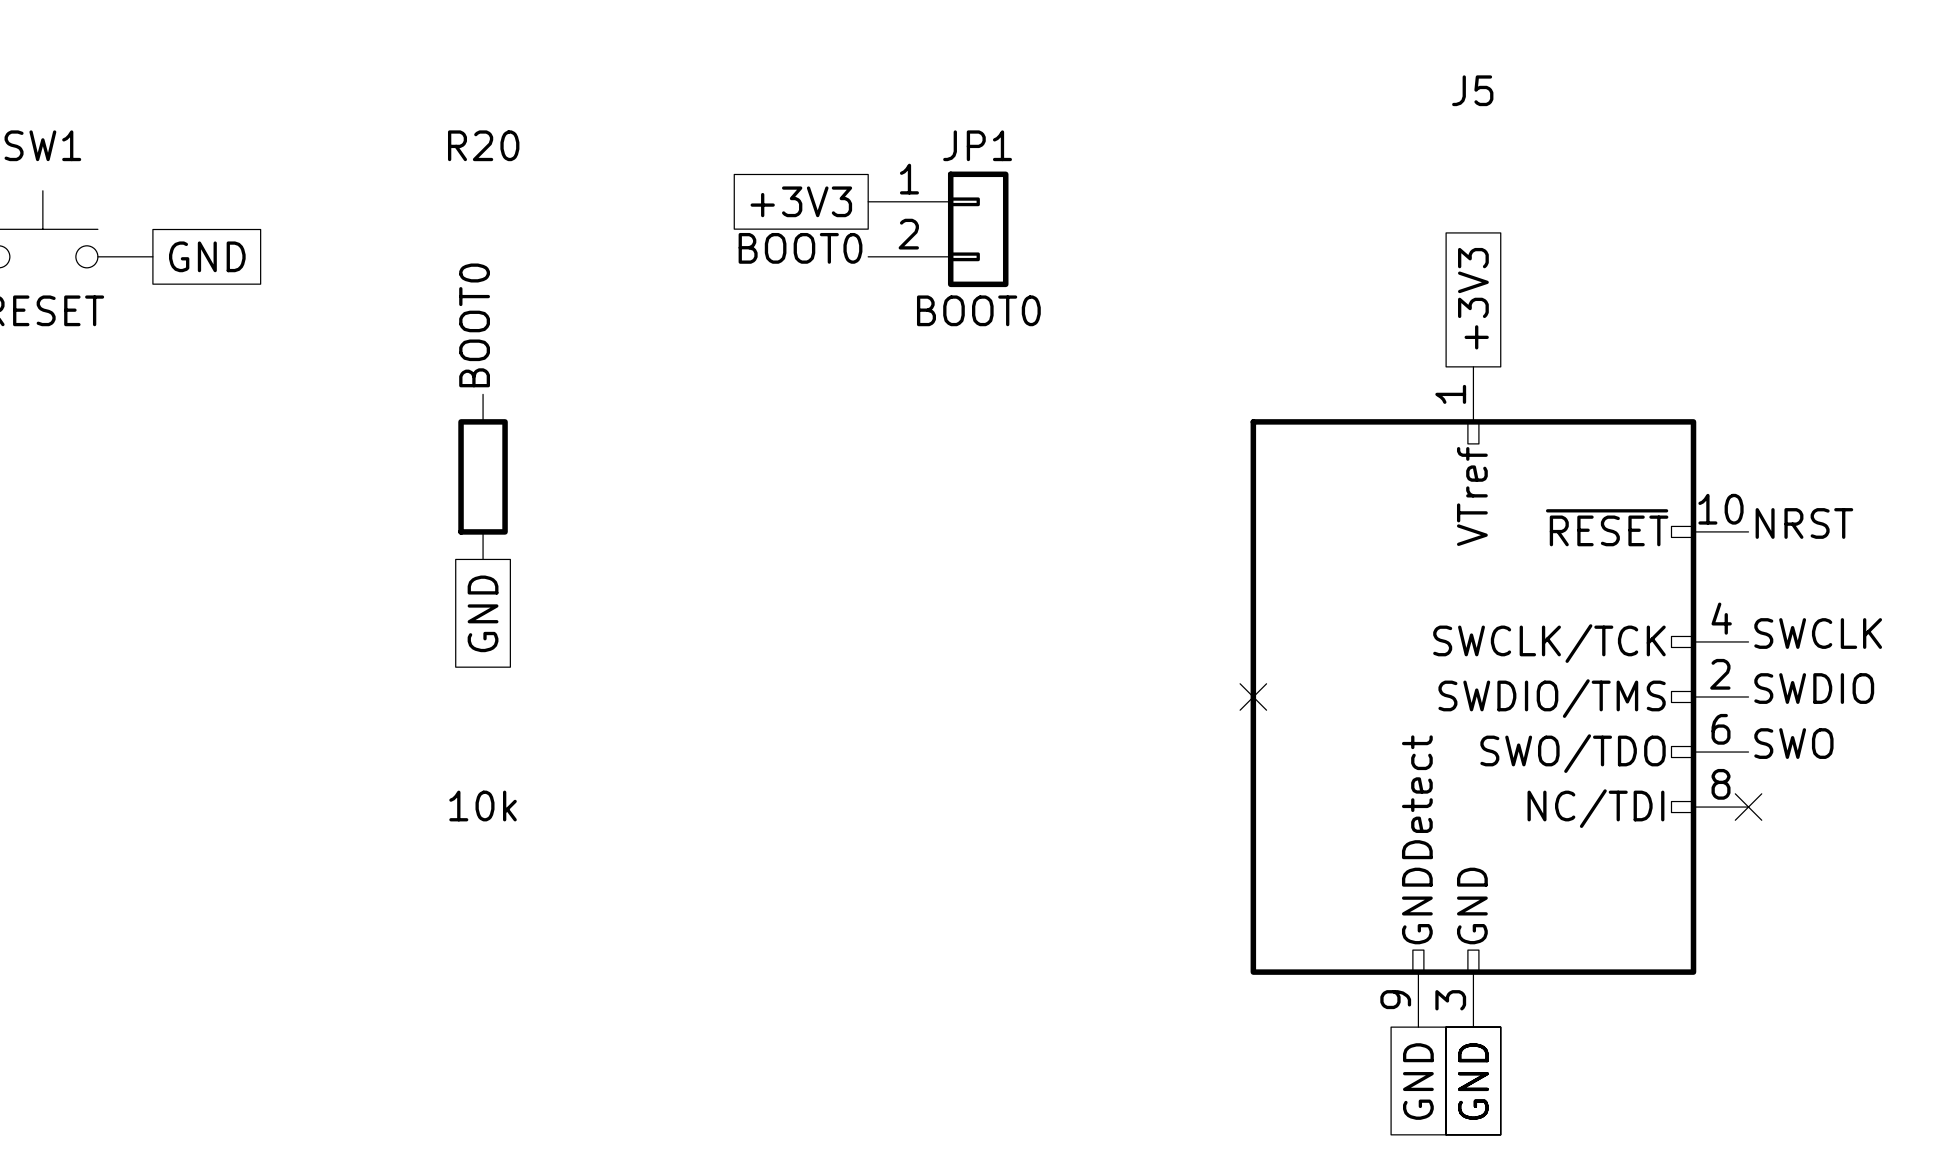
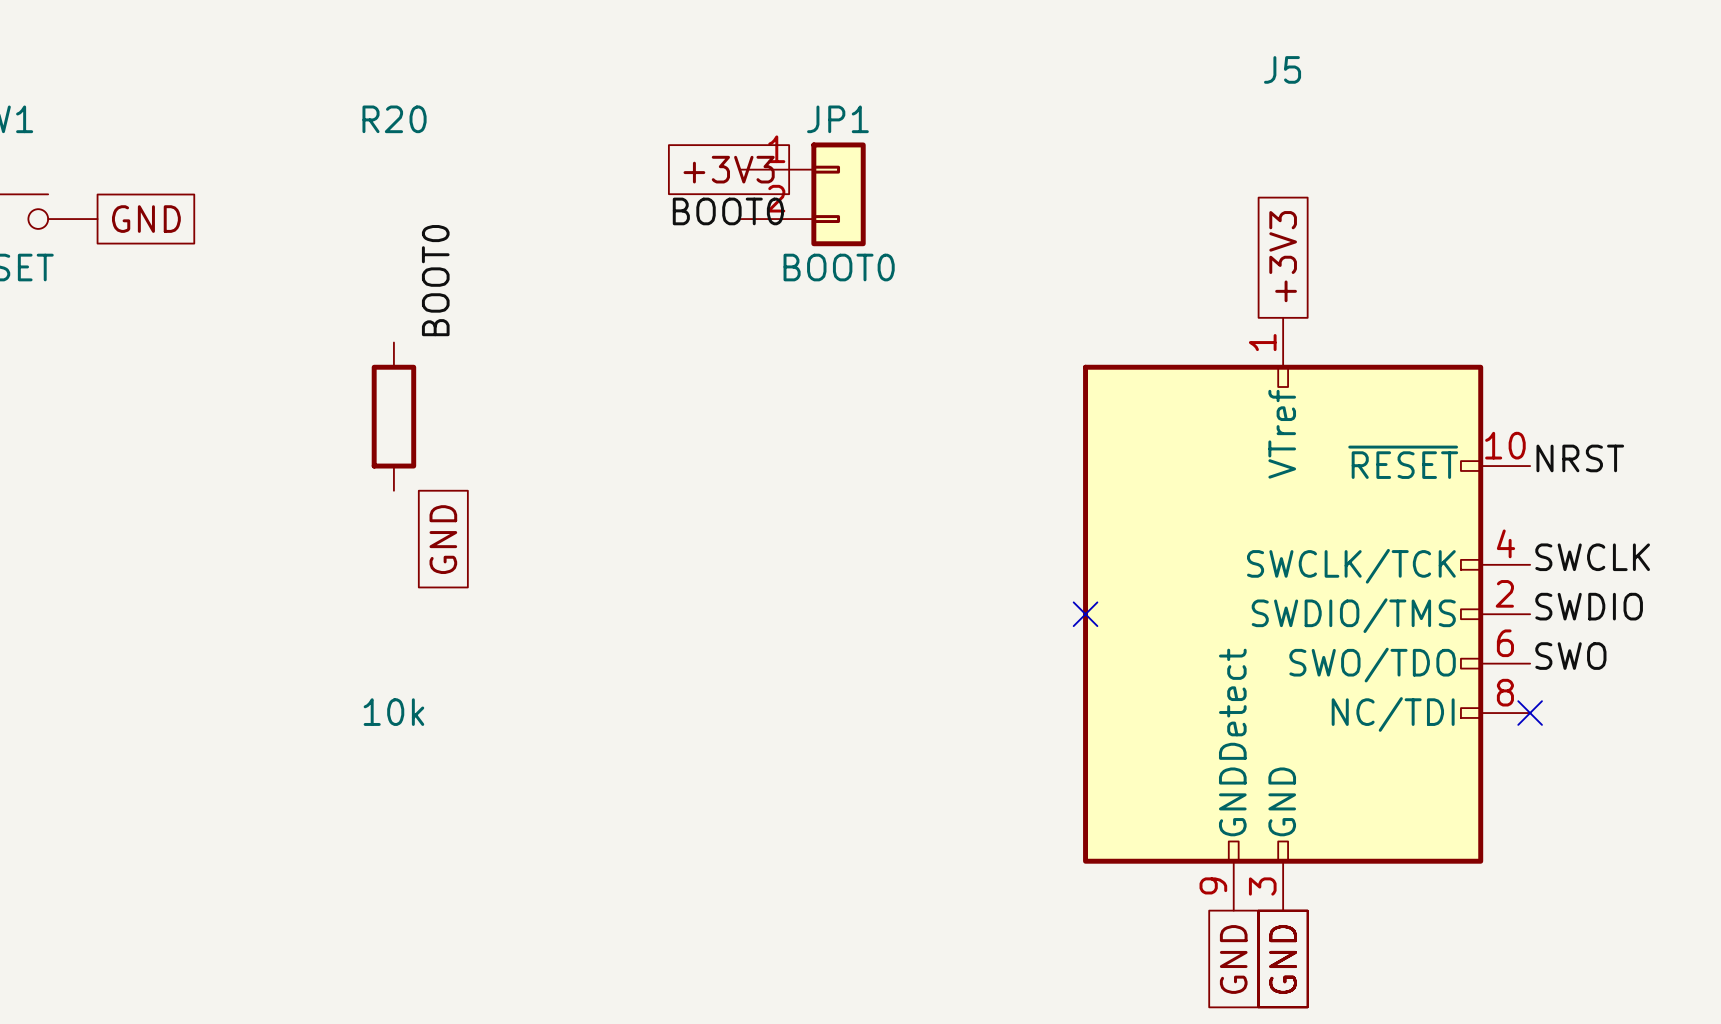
global label position: +3V3 (801, 201) -> +3V3 (729, 169)
label position: BOOT0 (800, 248) -> BOOT0 (728, 211)
label position: BOOT0 (474, 325) -> BOOT0 (435, 280)
global label position: GND (483, 613) -> GND (443, 539)

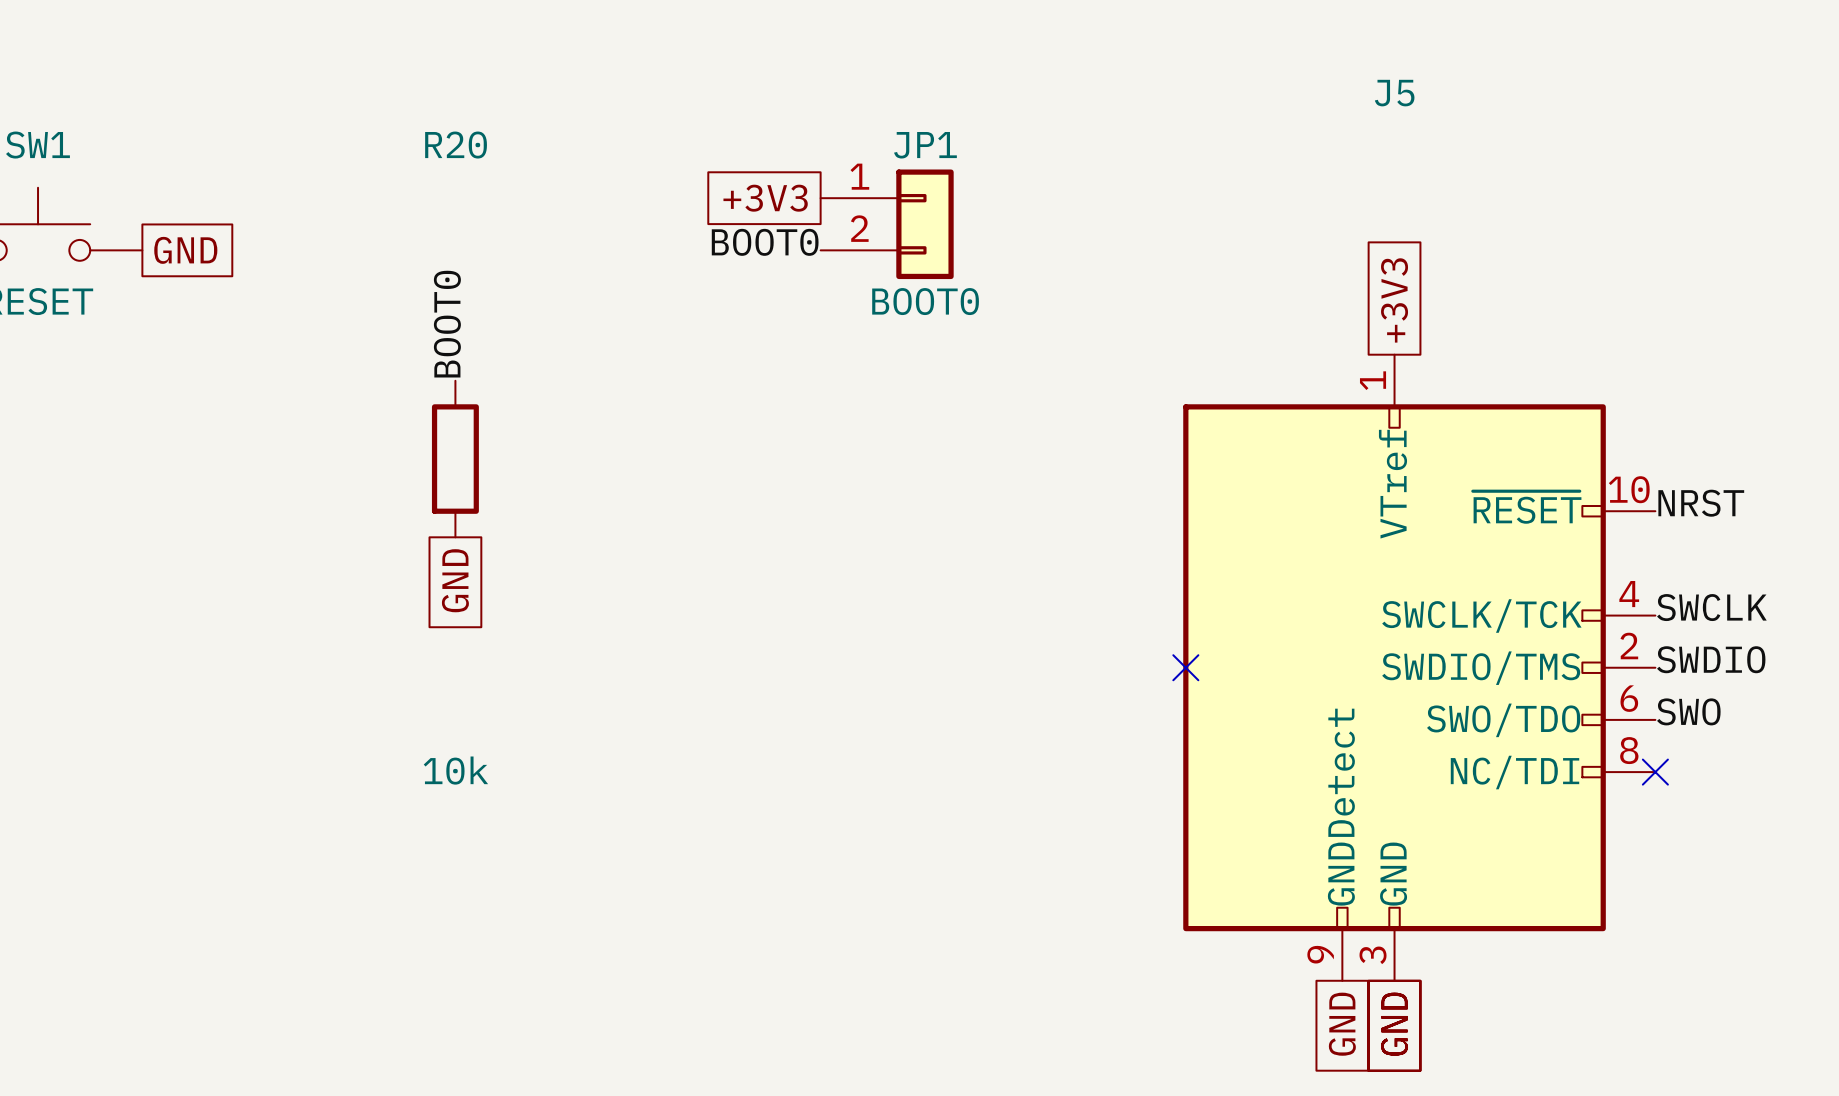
global label position: +3V3 (729, 169) -> +3V3 (765, 198)
label position: BOOT0 (728, 211) -> BOOT0 (765, 242)
label position: BOOT0 (435, 280) -> BOOT0 (447, 324)
global label position: GND (443, 539) -> GND (455, 580)

